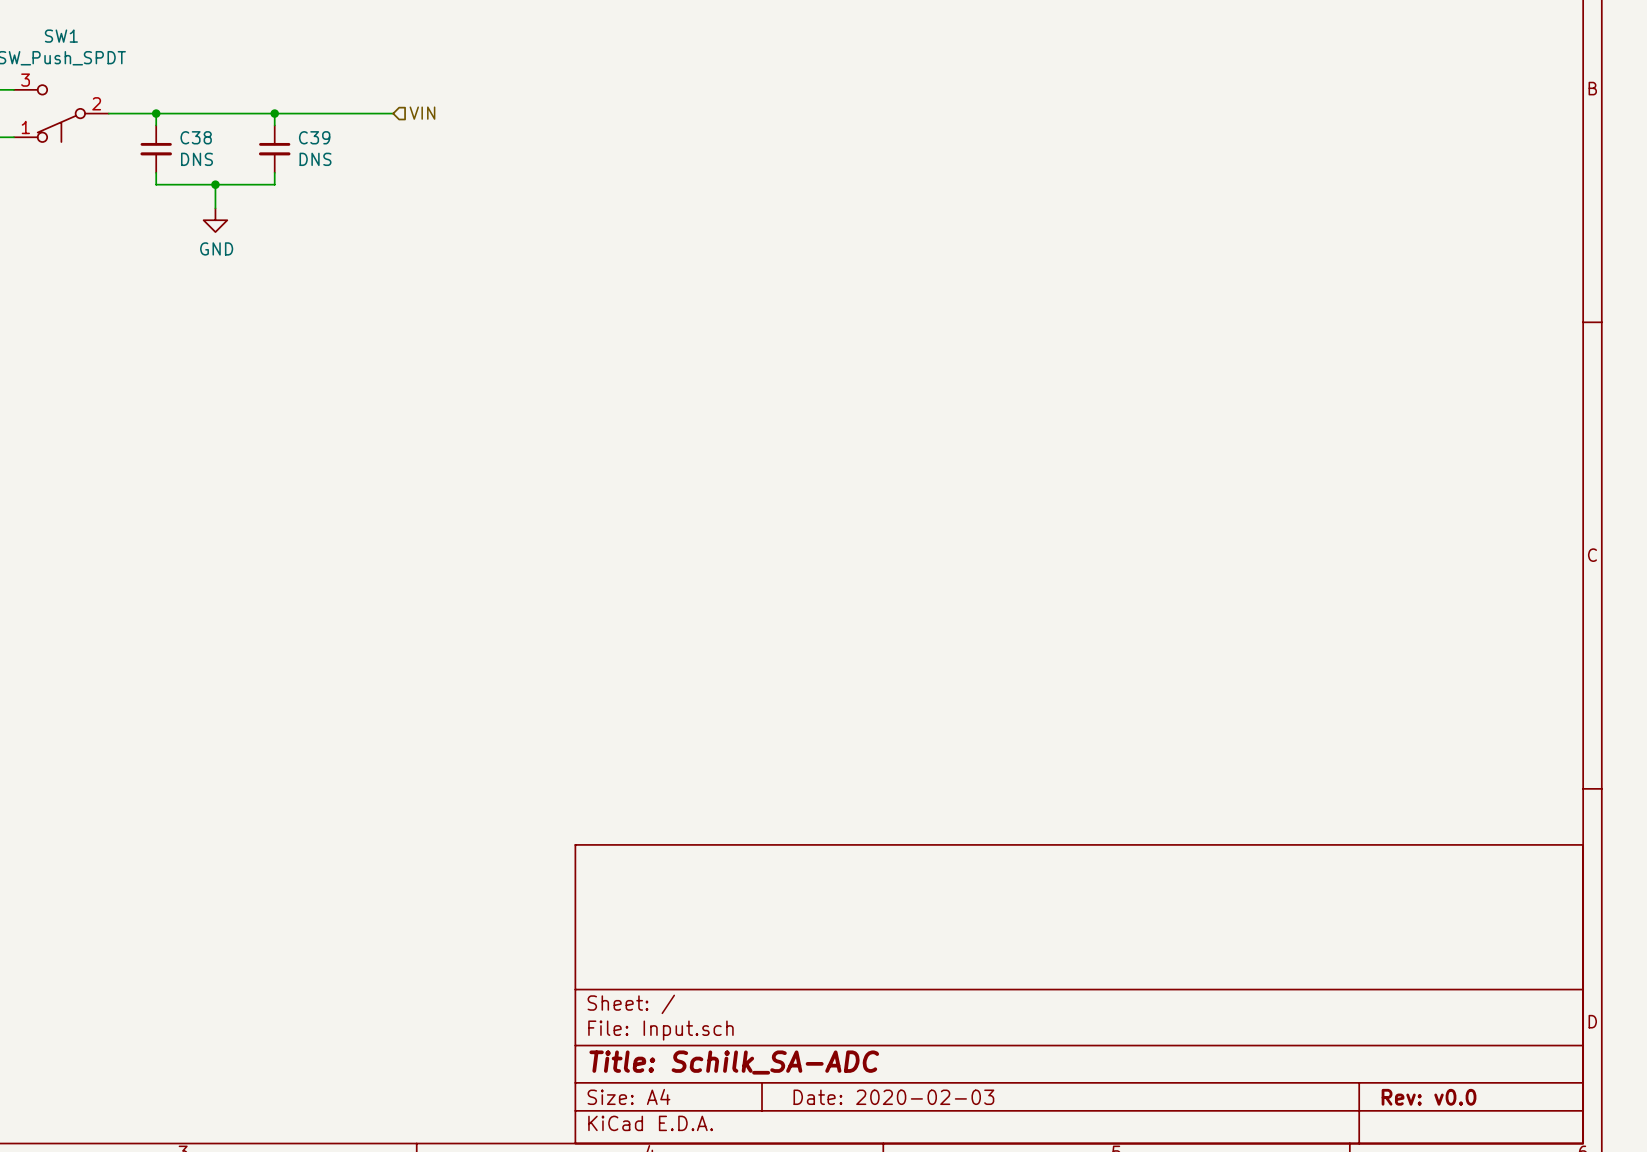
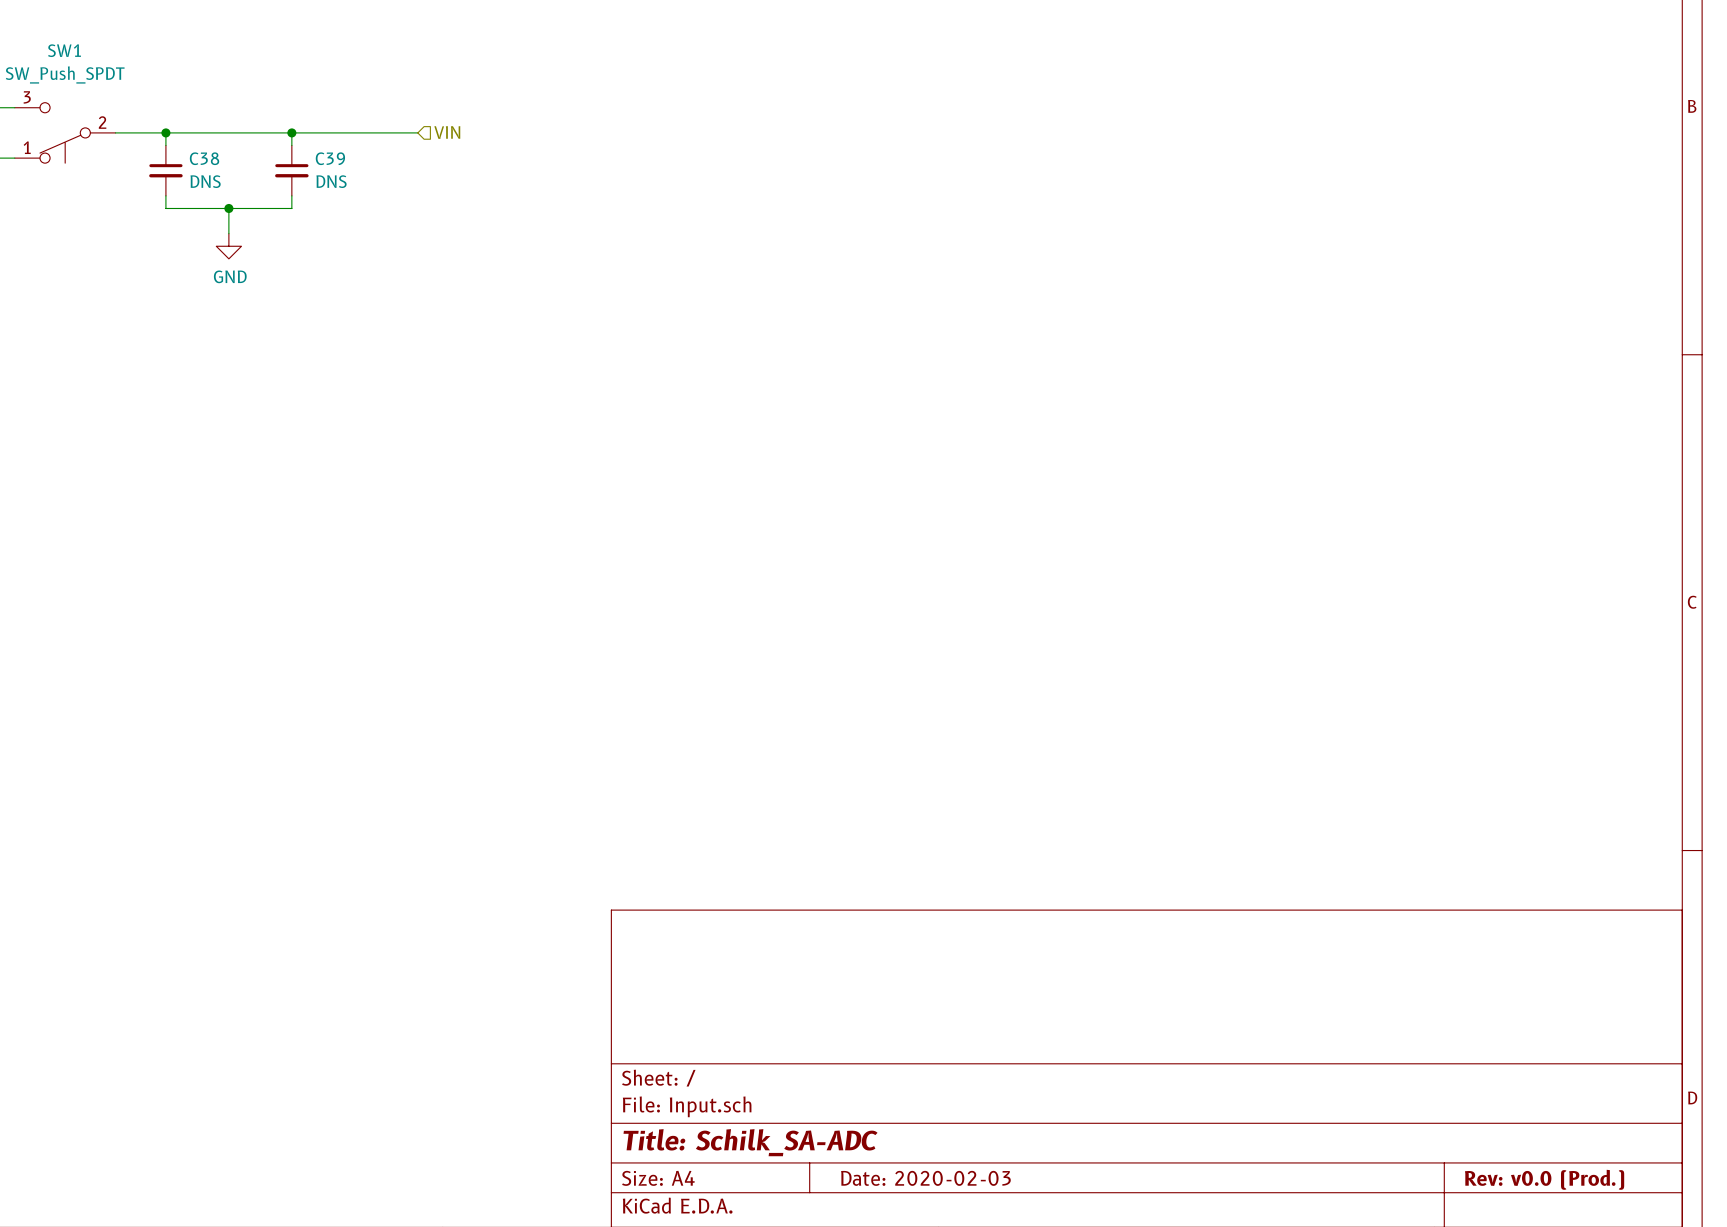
title block: Rev: v0.0 (1429, 1097) -> Rev: v0.0 (Prod.) (1544, 1179)

